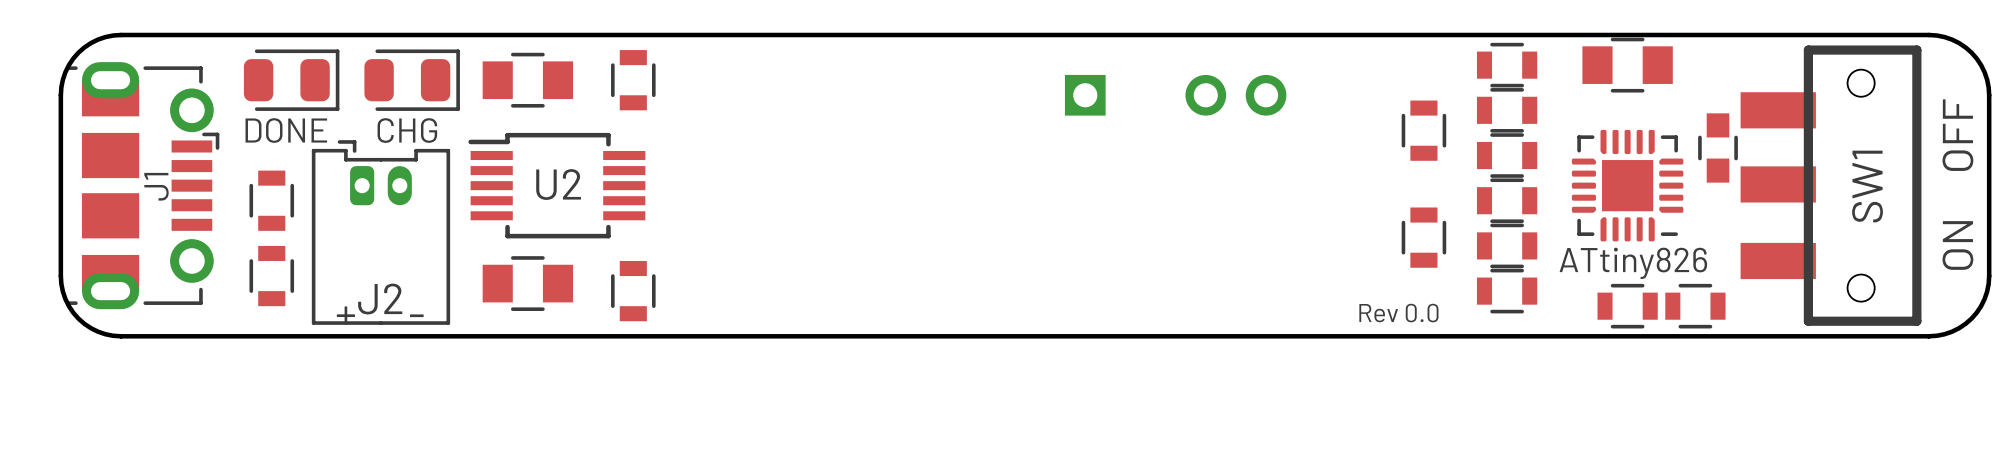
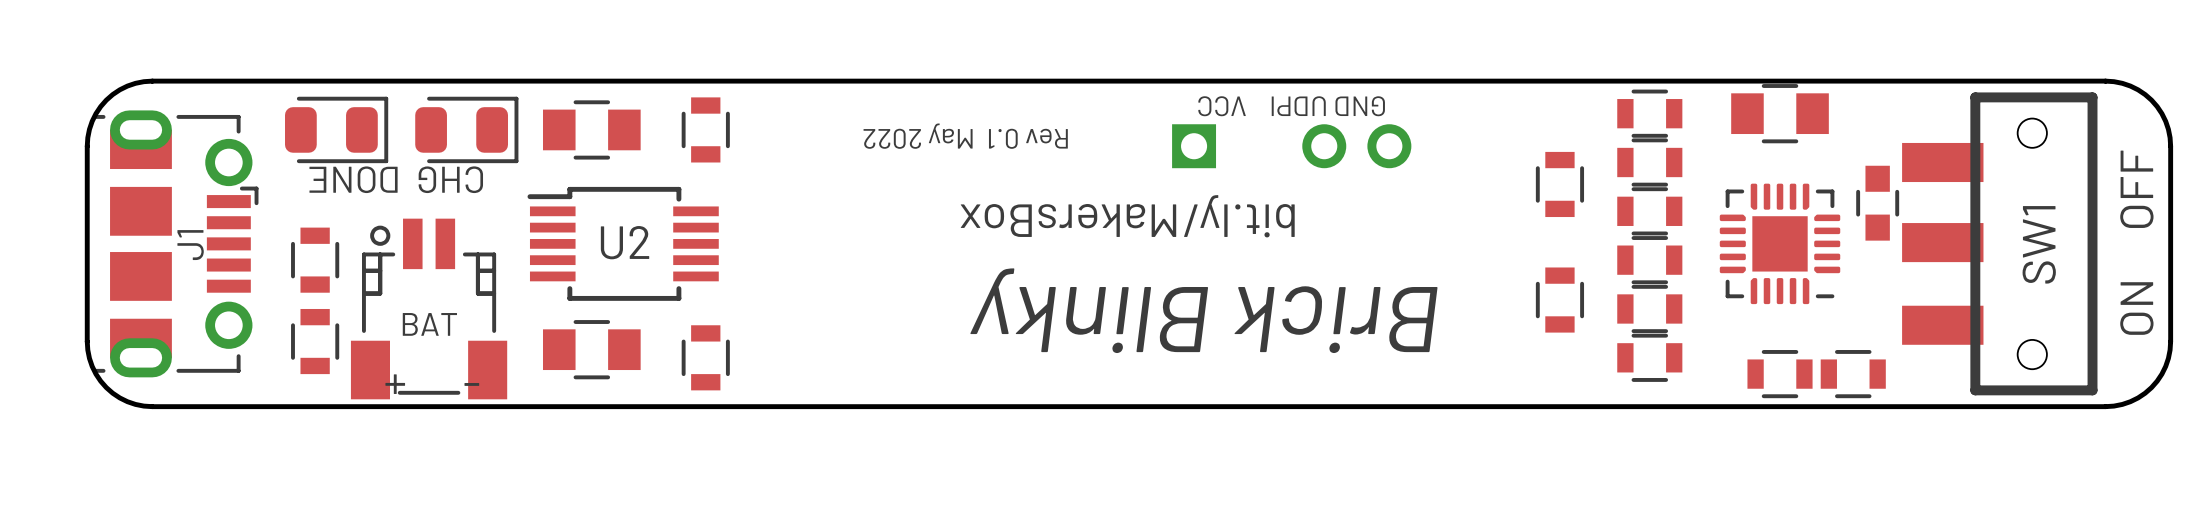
text: none -> GND UDPI VCC (1291, 106)
text: none -> Rev 0.1 May 2022 (965, 136)
text: none -> CHG DONE (396, 179)
part value: DONE (286, 130) -> none
part value: CHG (407, 130) -> none
text: none -> bit.ly/MakersBox (1127, 216)
J2: (380, 232) -> none
part: none -> BAT (429, 308)
text: none -> Brick Blinky (1203, 310)
part value: ATtiny826 (1633, 263) -> none
text: Rev 0.0 (1398, 313) -> none

